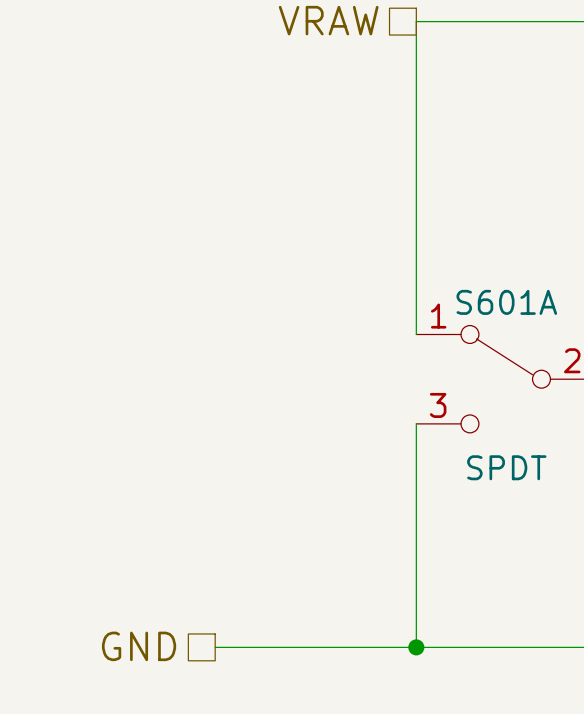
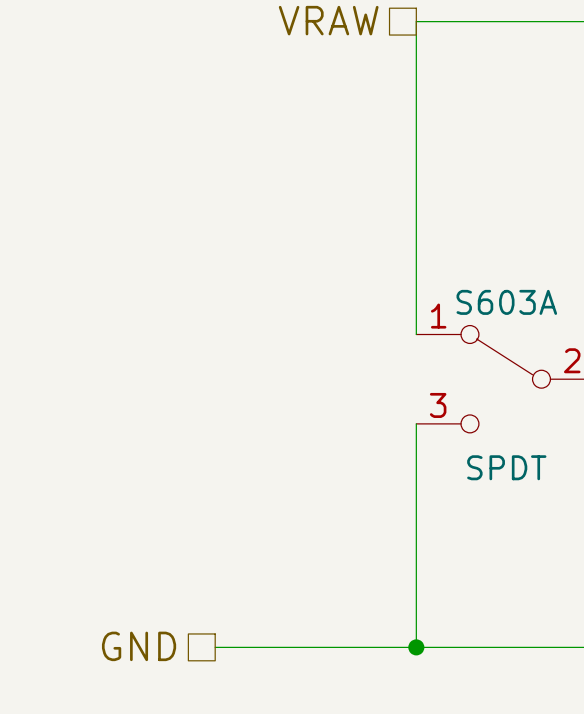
S601A name: S601A (506, 302) -> S603A (506, 302)

